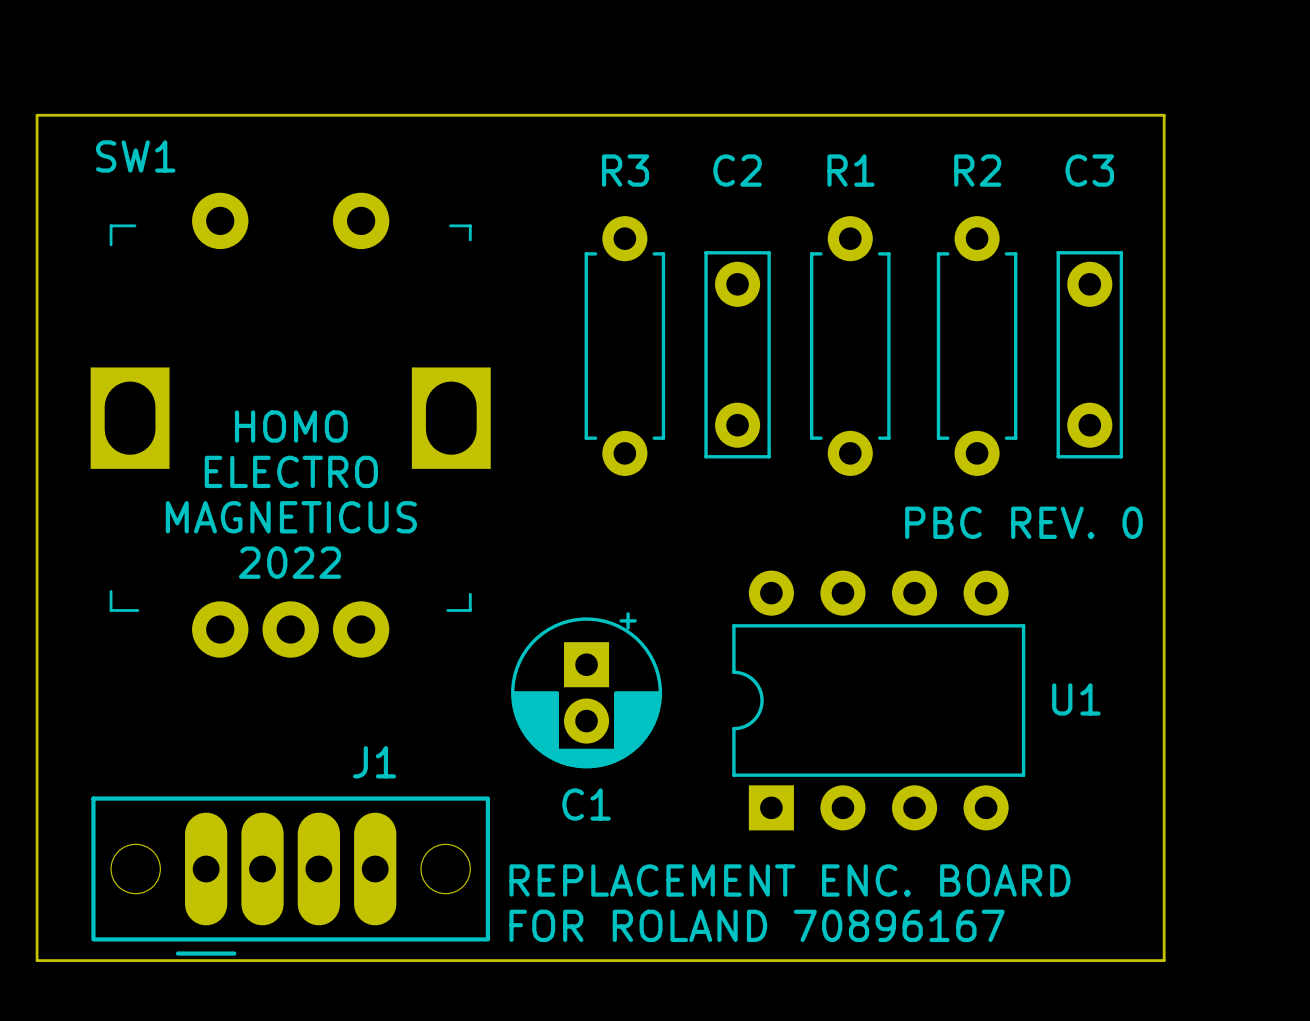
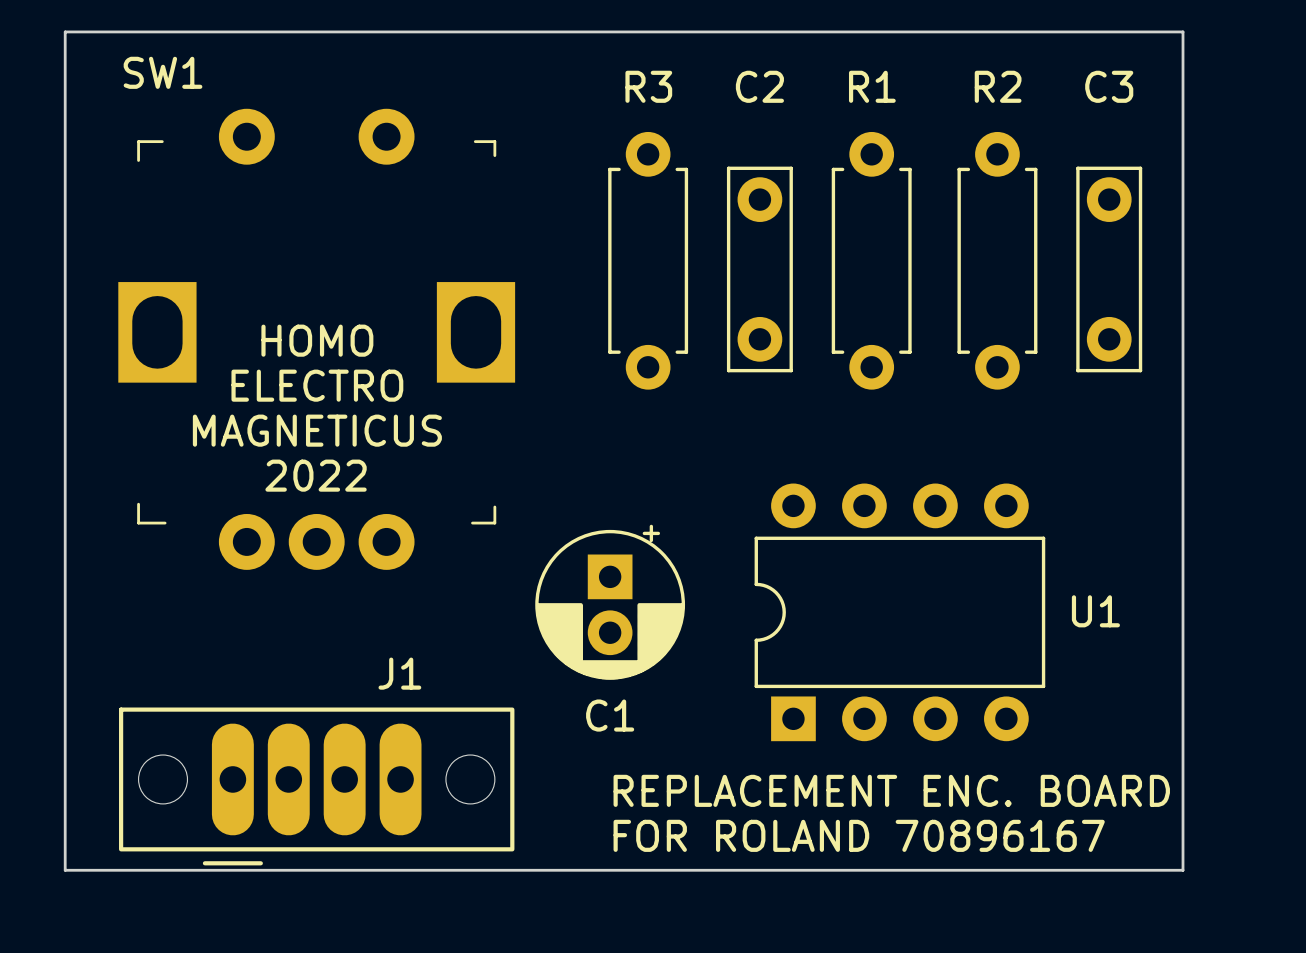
text: PBC REV. 0 (1023, 522) -> none
text position: REPLACEMENT ENC. BOARD (789, 880) -> REPLACEMENT ENC. BOARD (891, 790)
text position: FOR ROLAND 70896167 (757, 925) -> FOR ROLAND 70896167 (859, 835)

